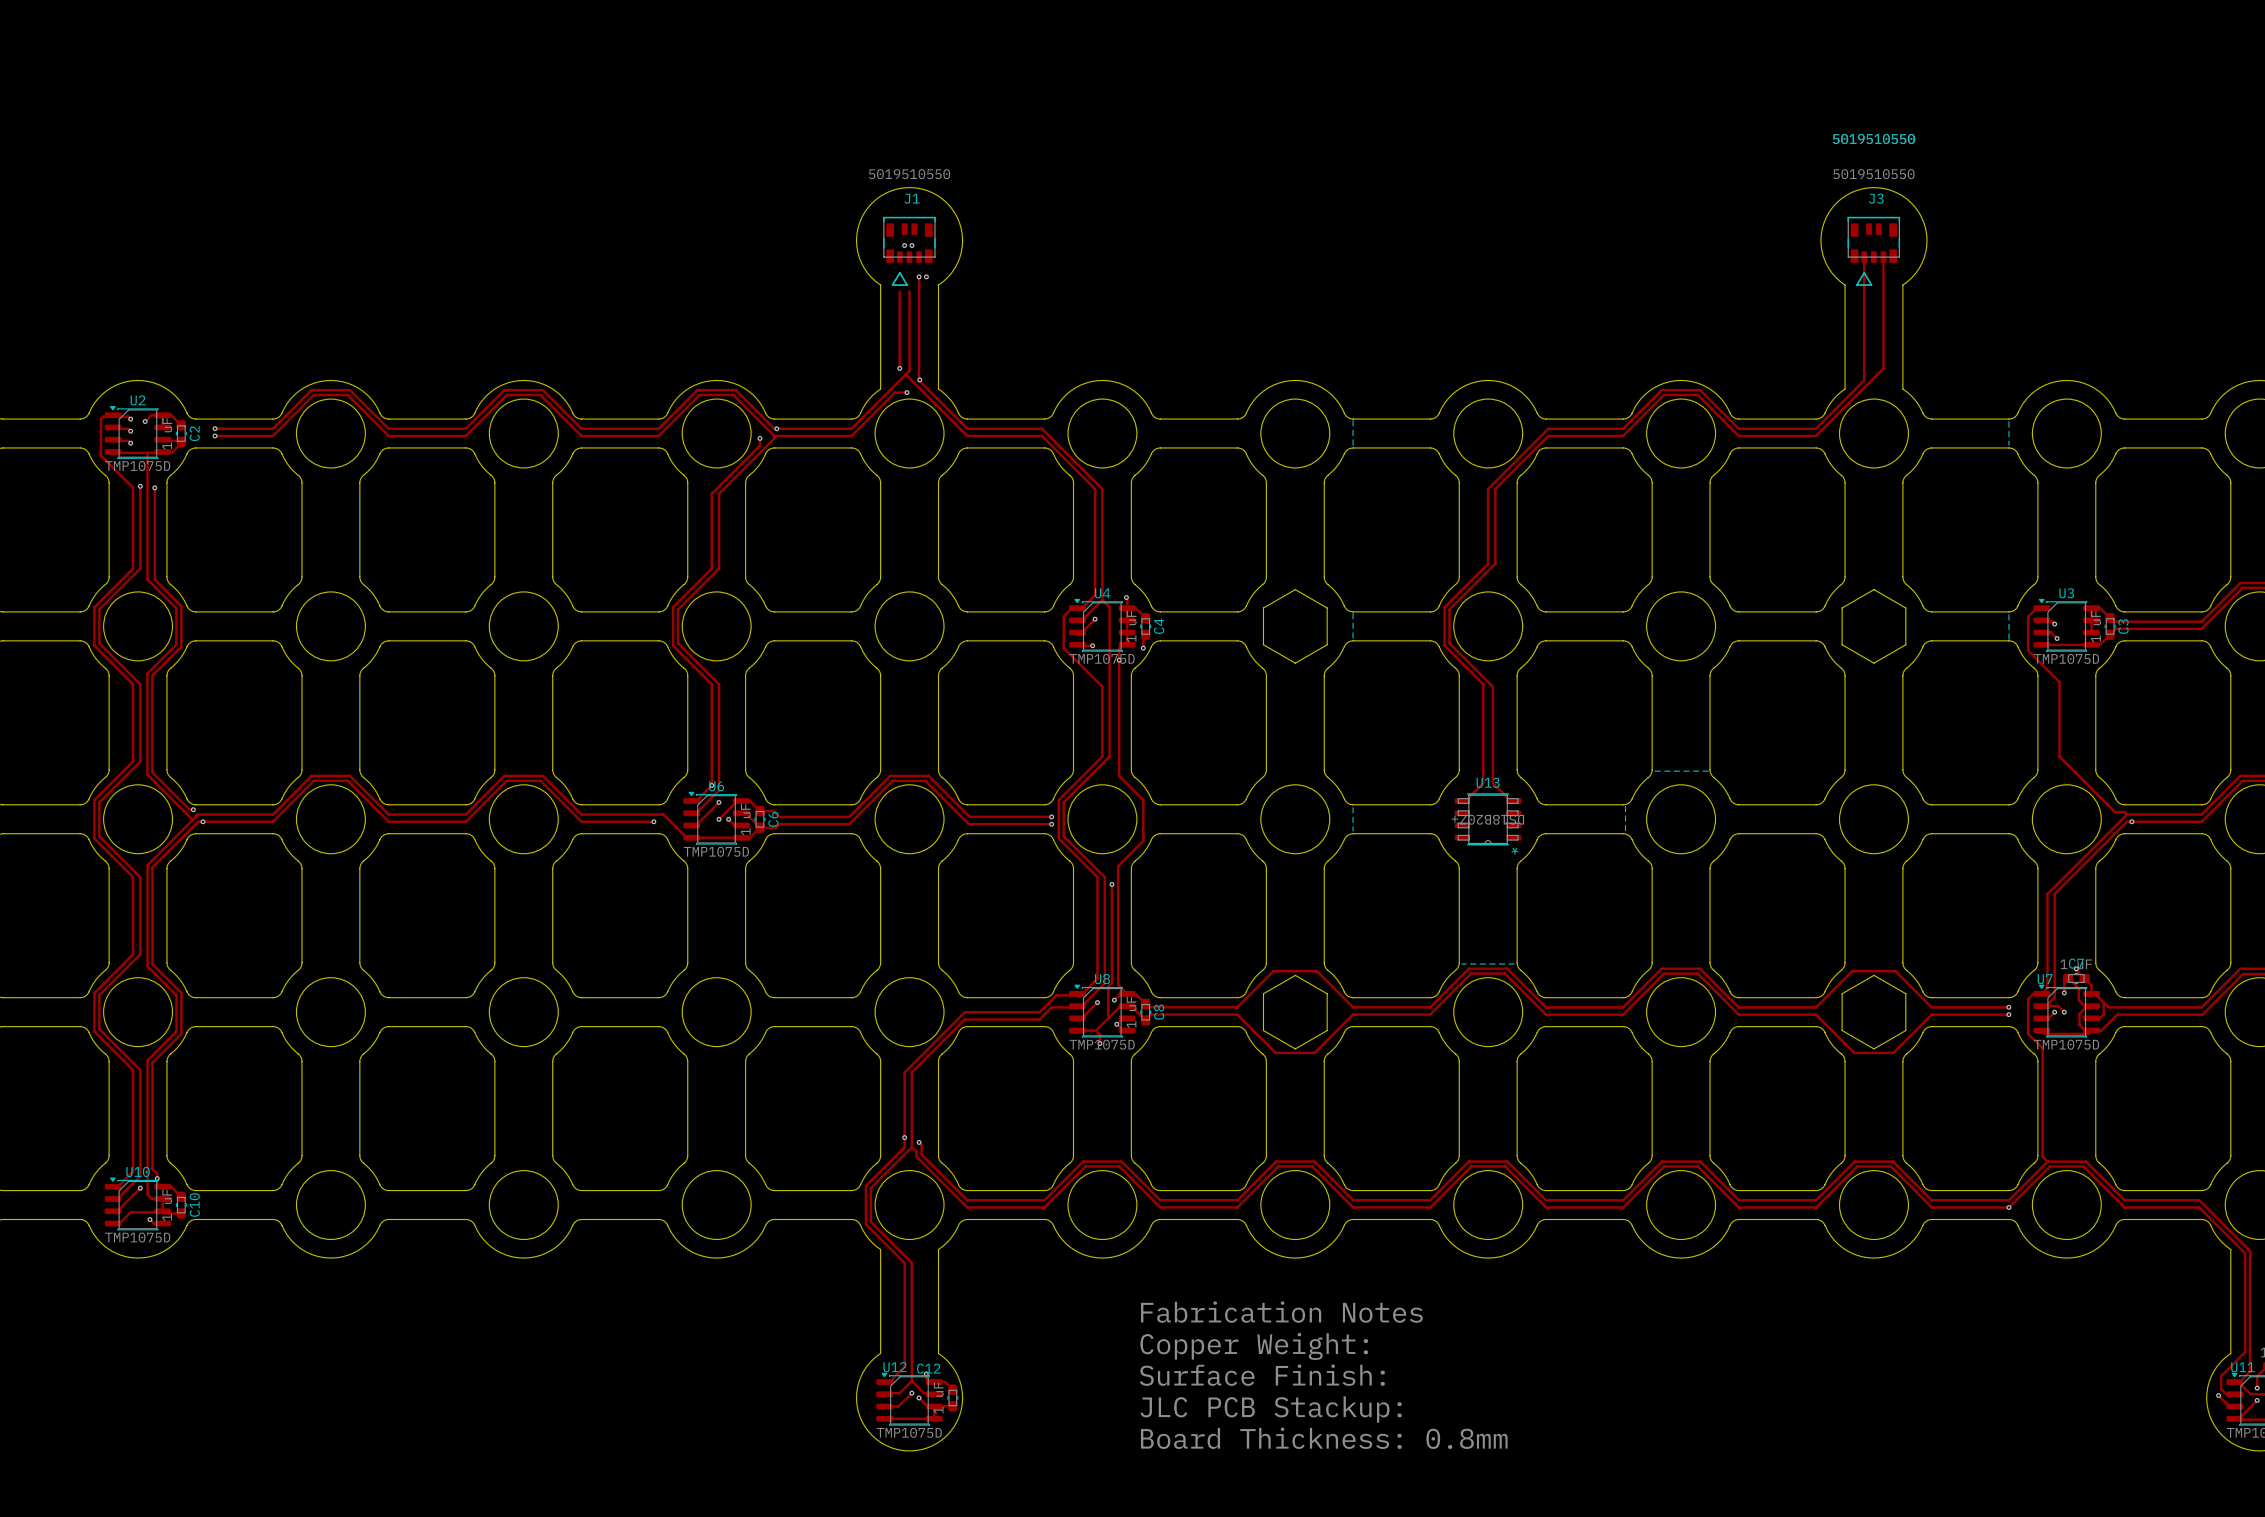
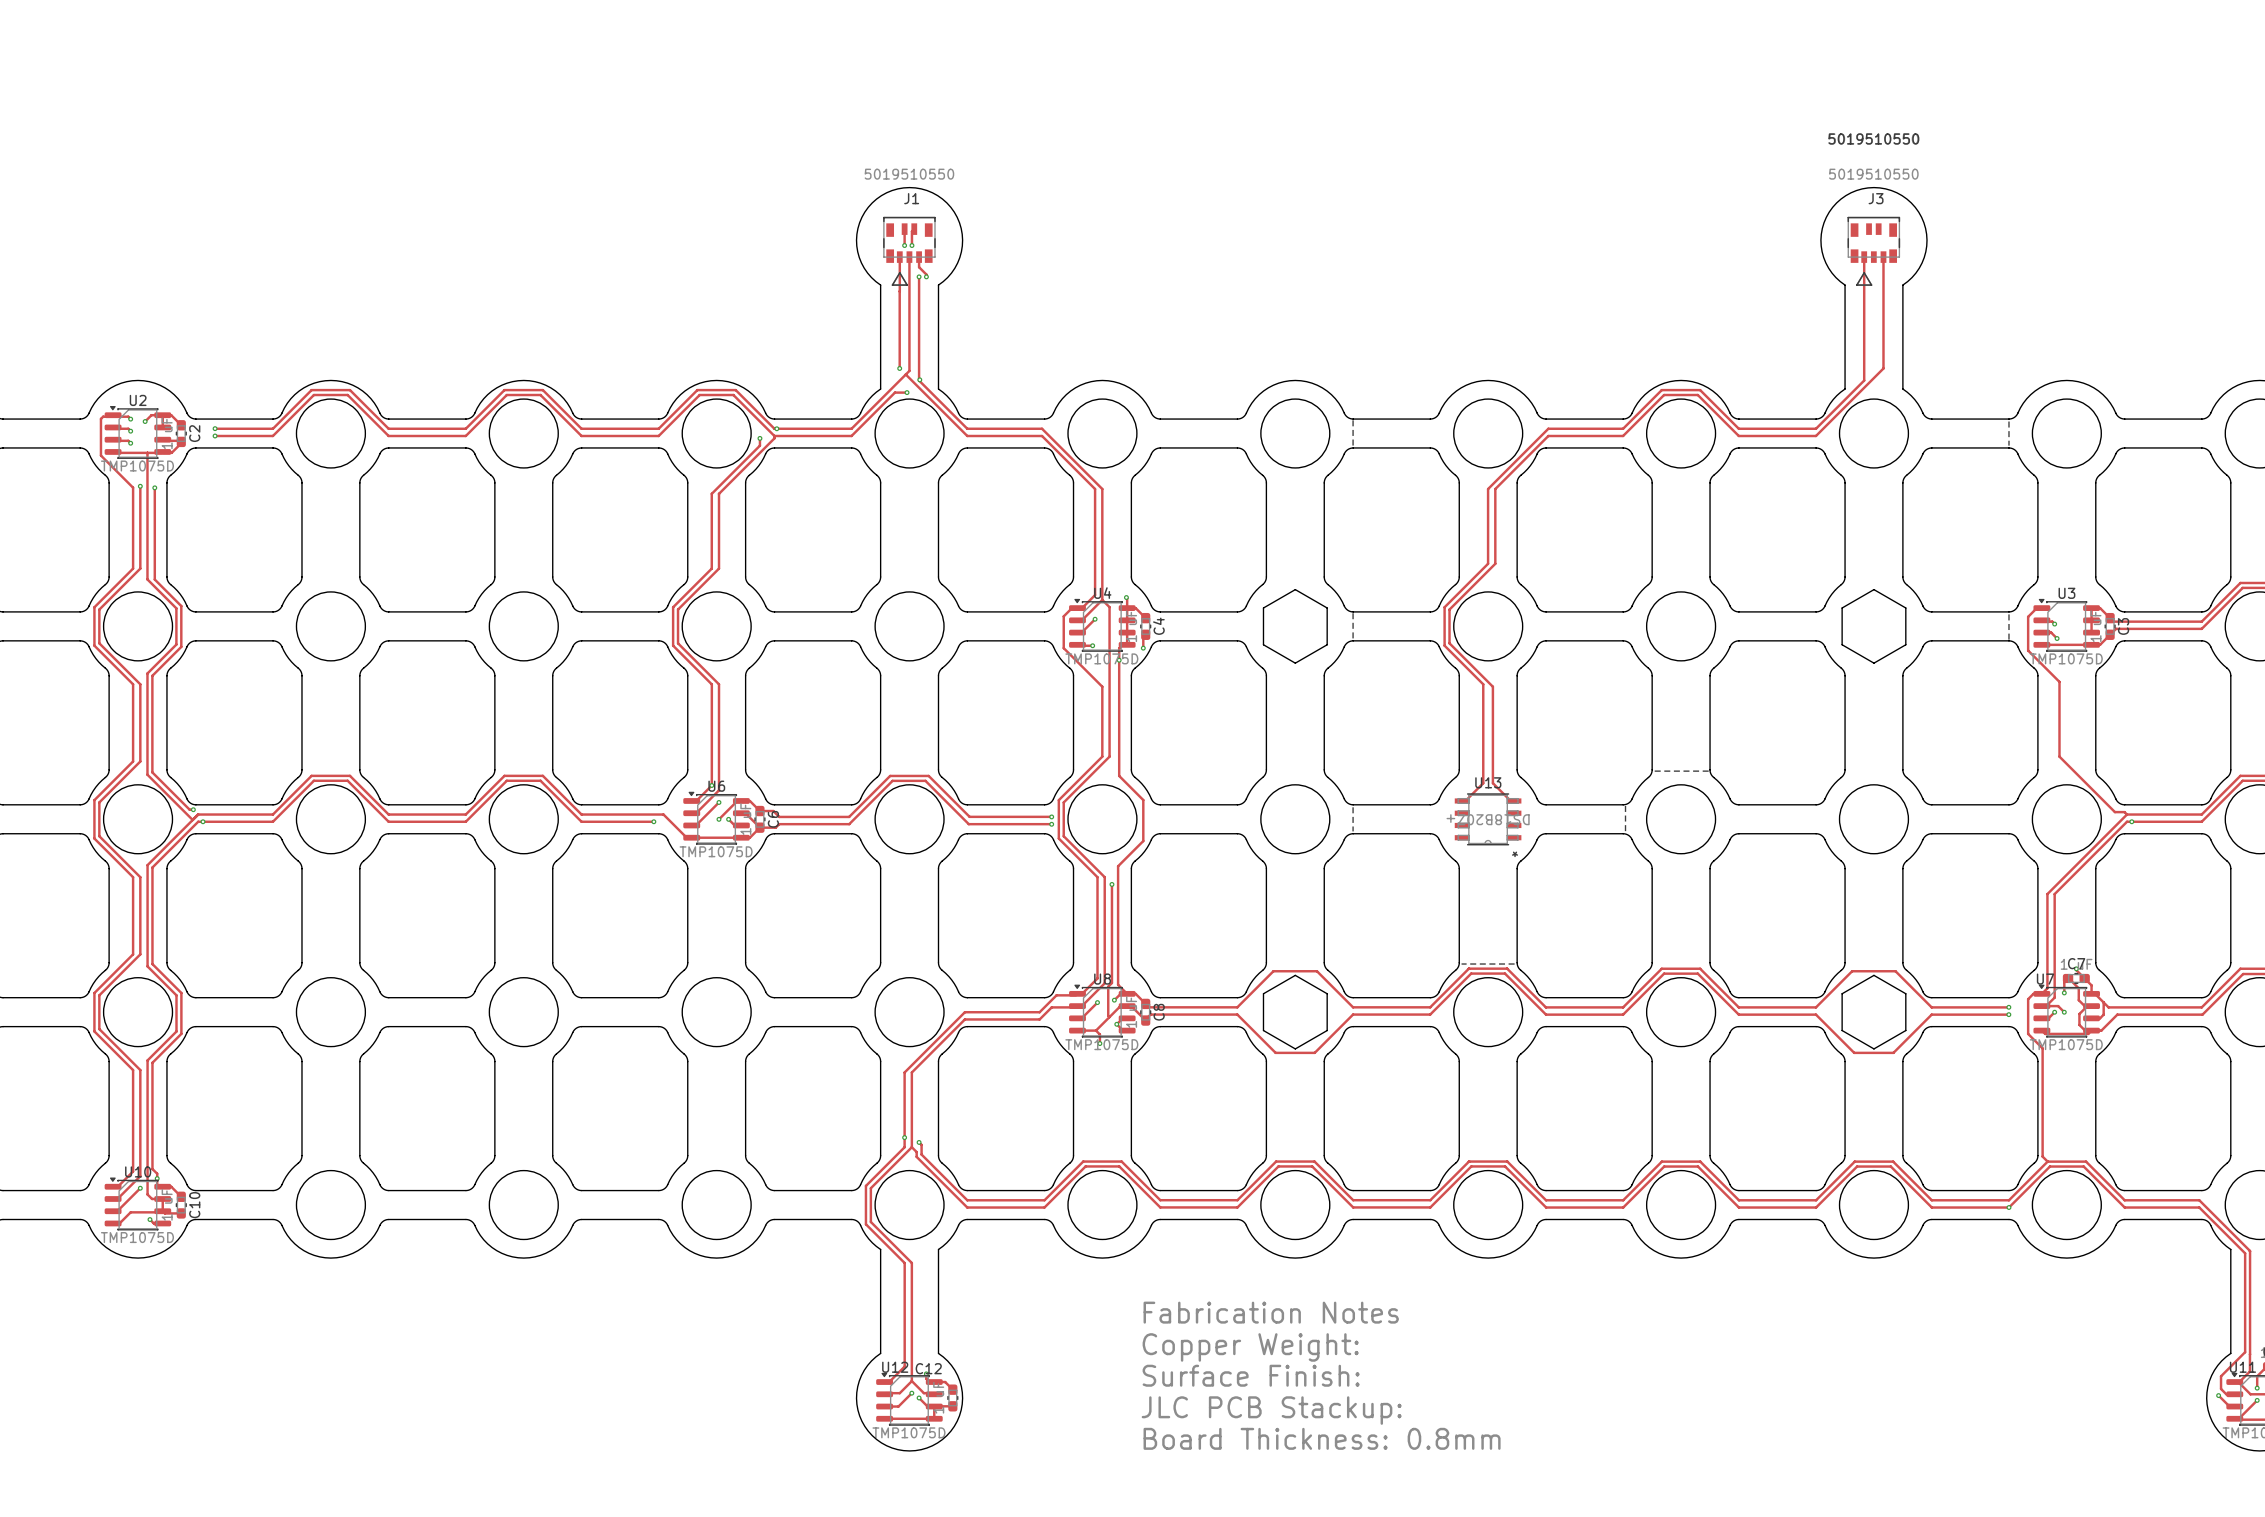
track: none -> (904, 229) (904, 245)
track: none -> (914, 229) (911, 231) (911, 245)
track: none -> (899, 257) (899, 291)
track: none -> (909, 257) (909, 291)
track: none -> (919, 257) (919, 267) (926, 276)

